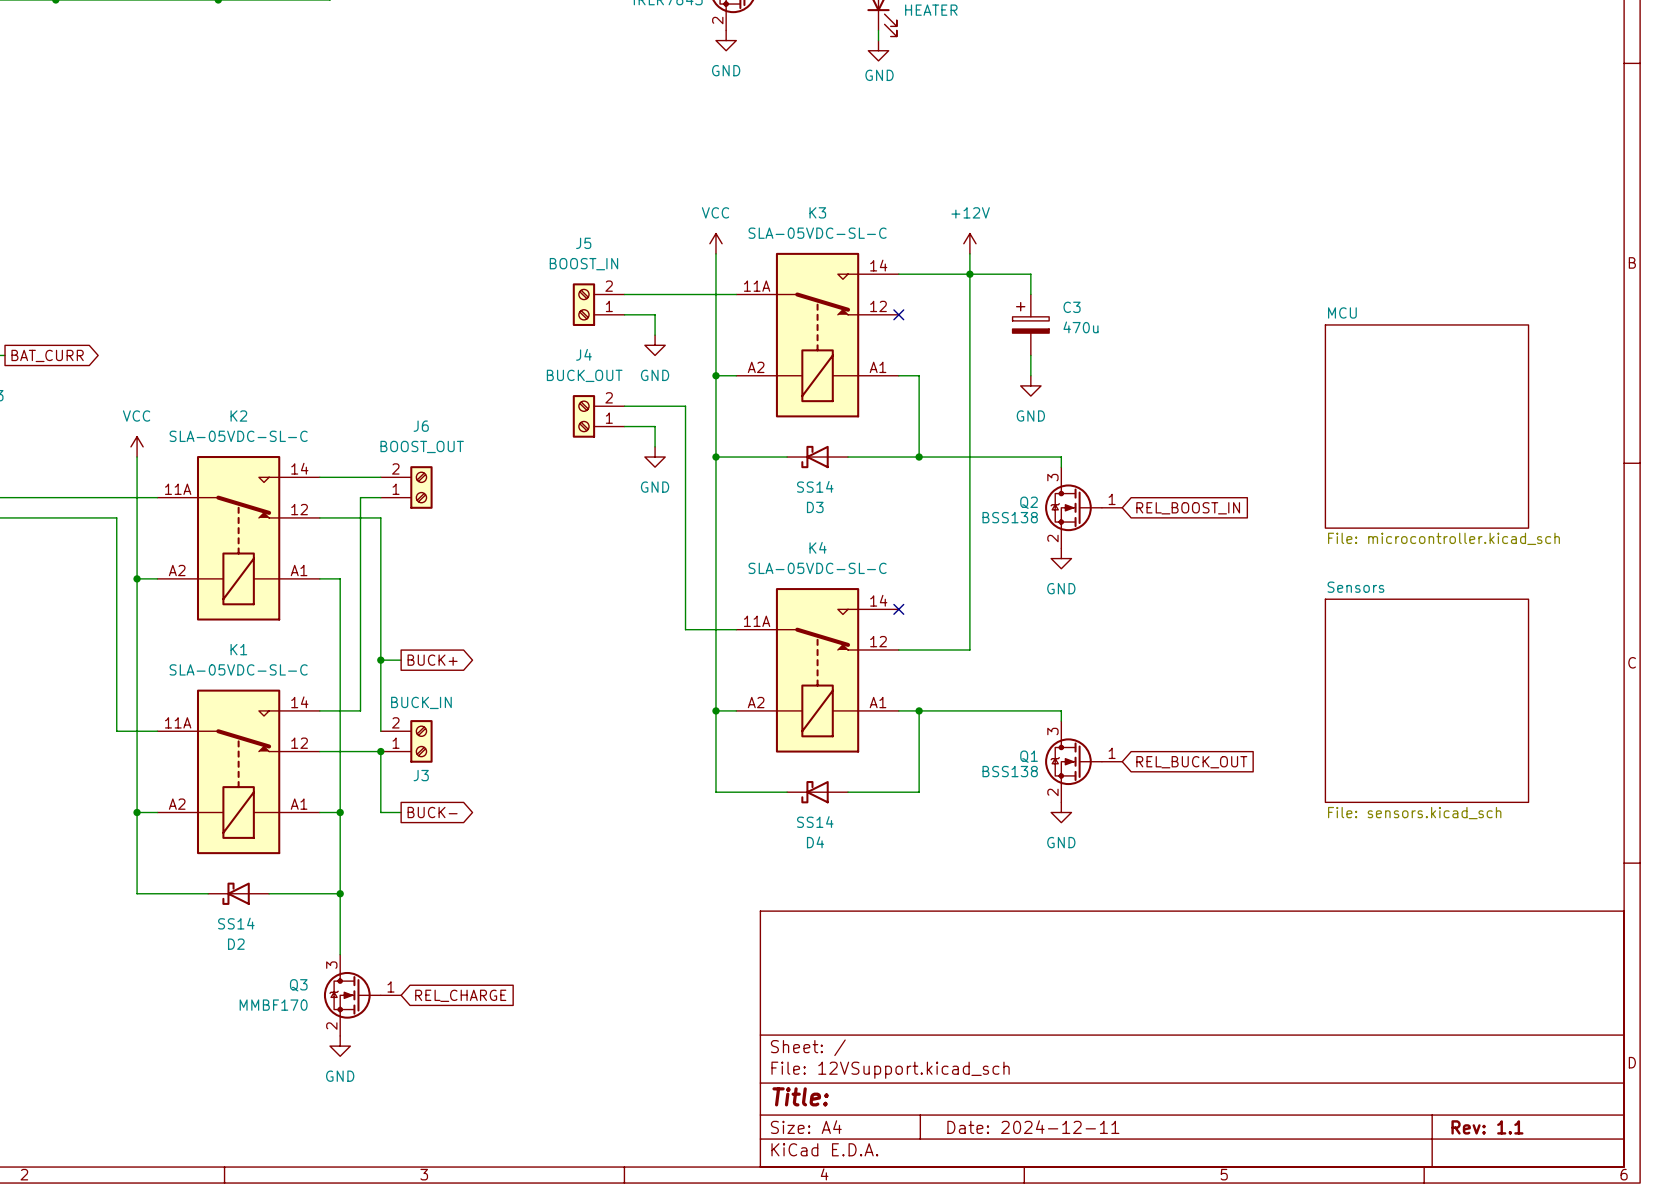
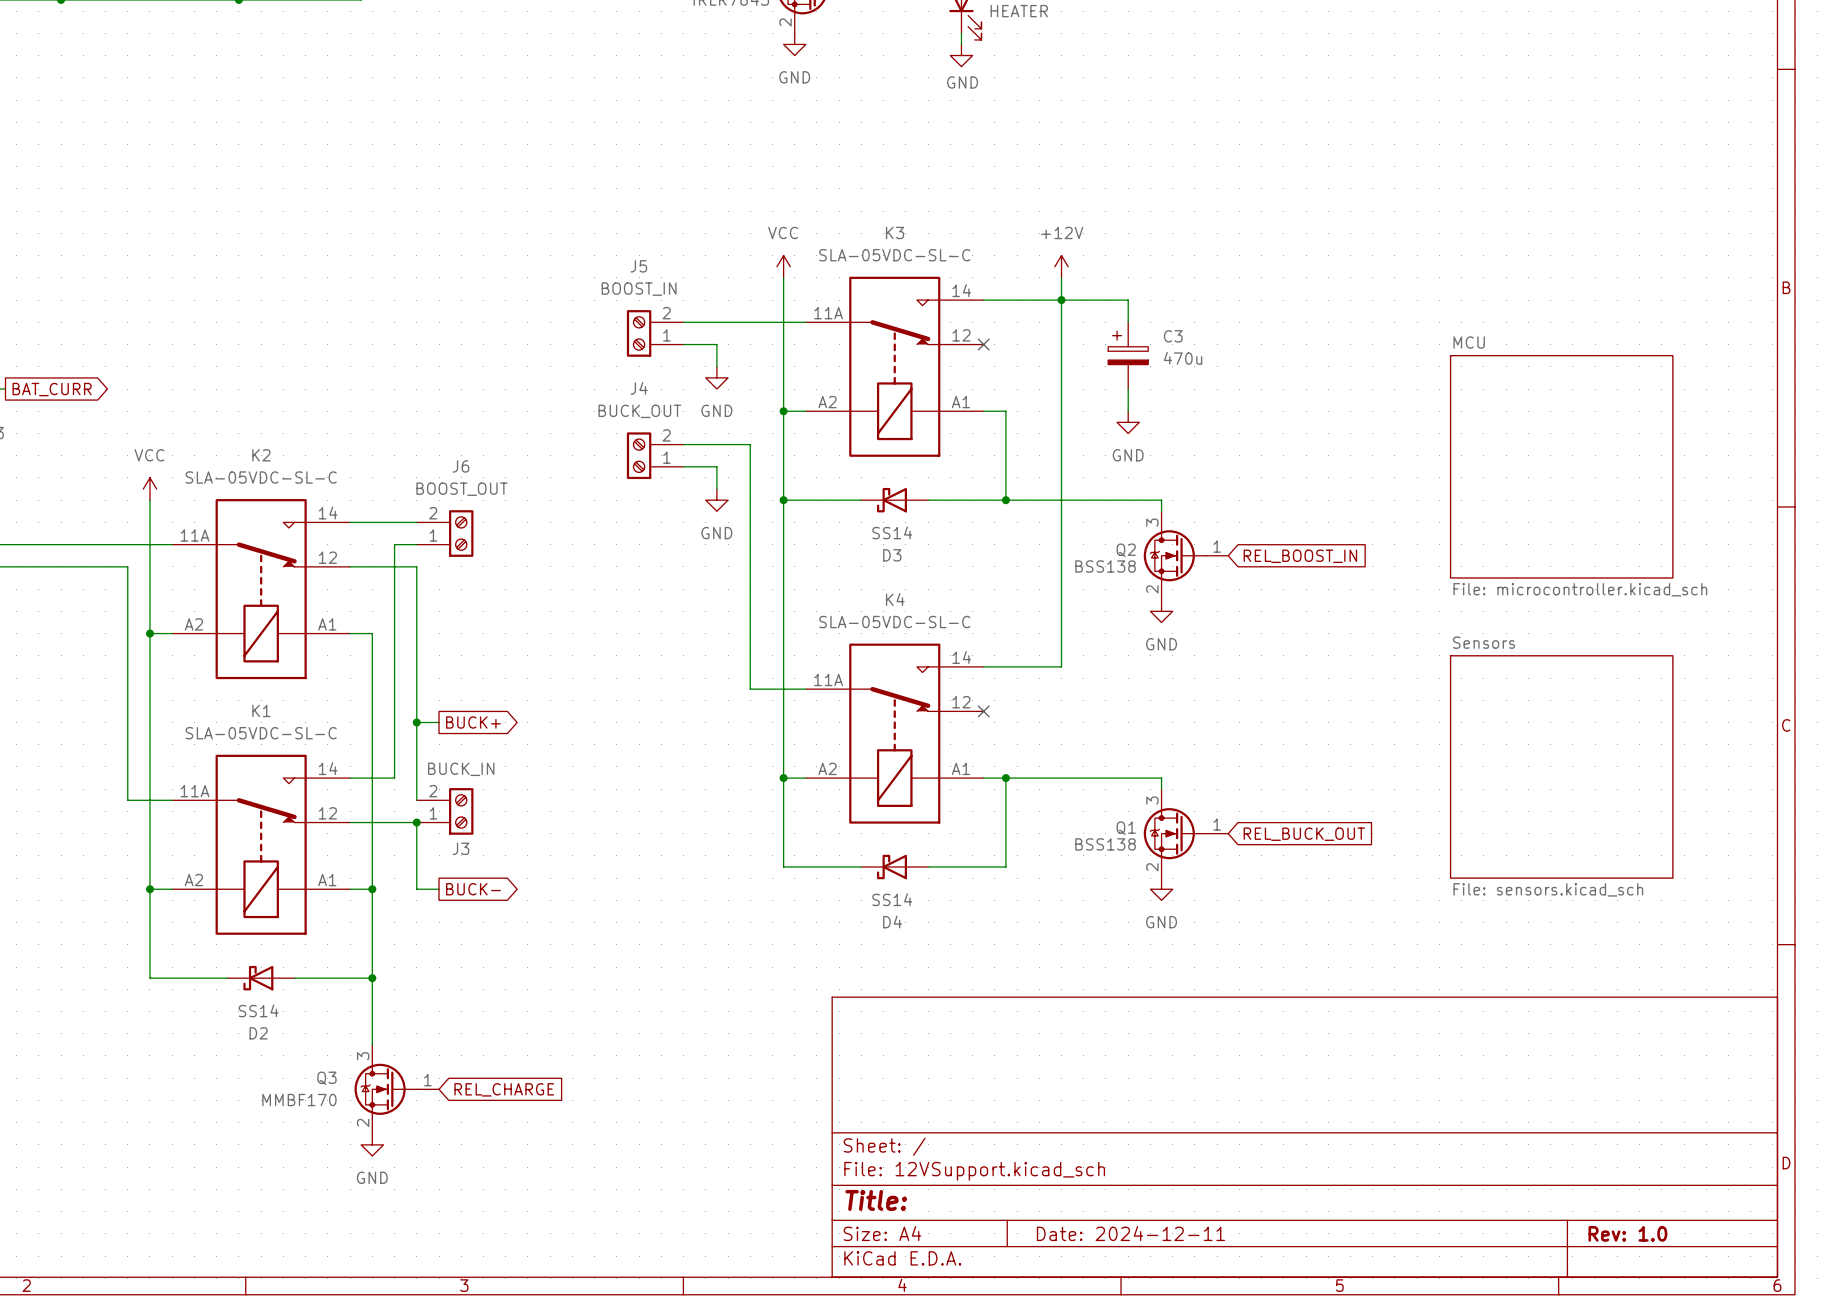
no-connect mark position: (898, 609) -> (983, 711)
wire: (969, 609) (969, 649) (898, 649) -> (1061, 666) (983, 666)
title block: Rev: 1.1 (1487, 1127) -> Rev: 1.0 (1627, 1233)

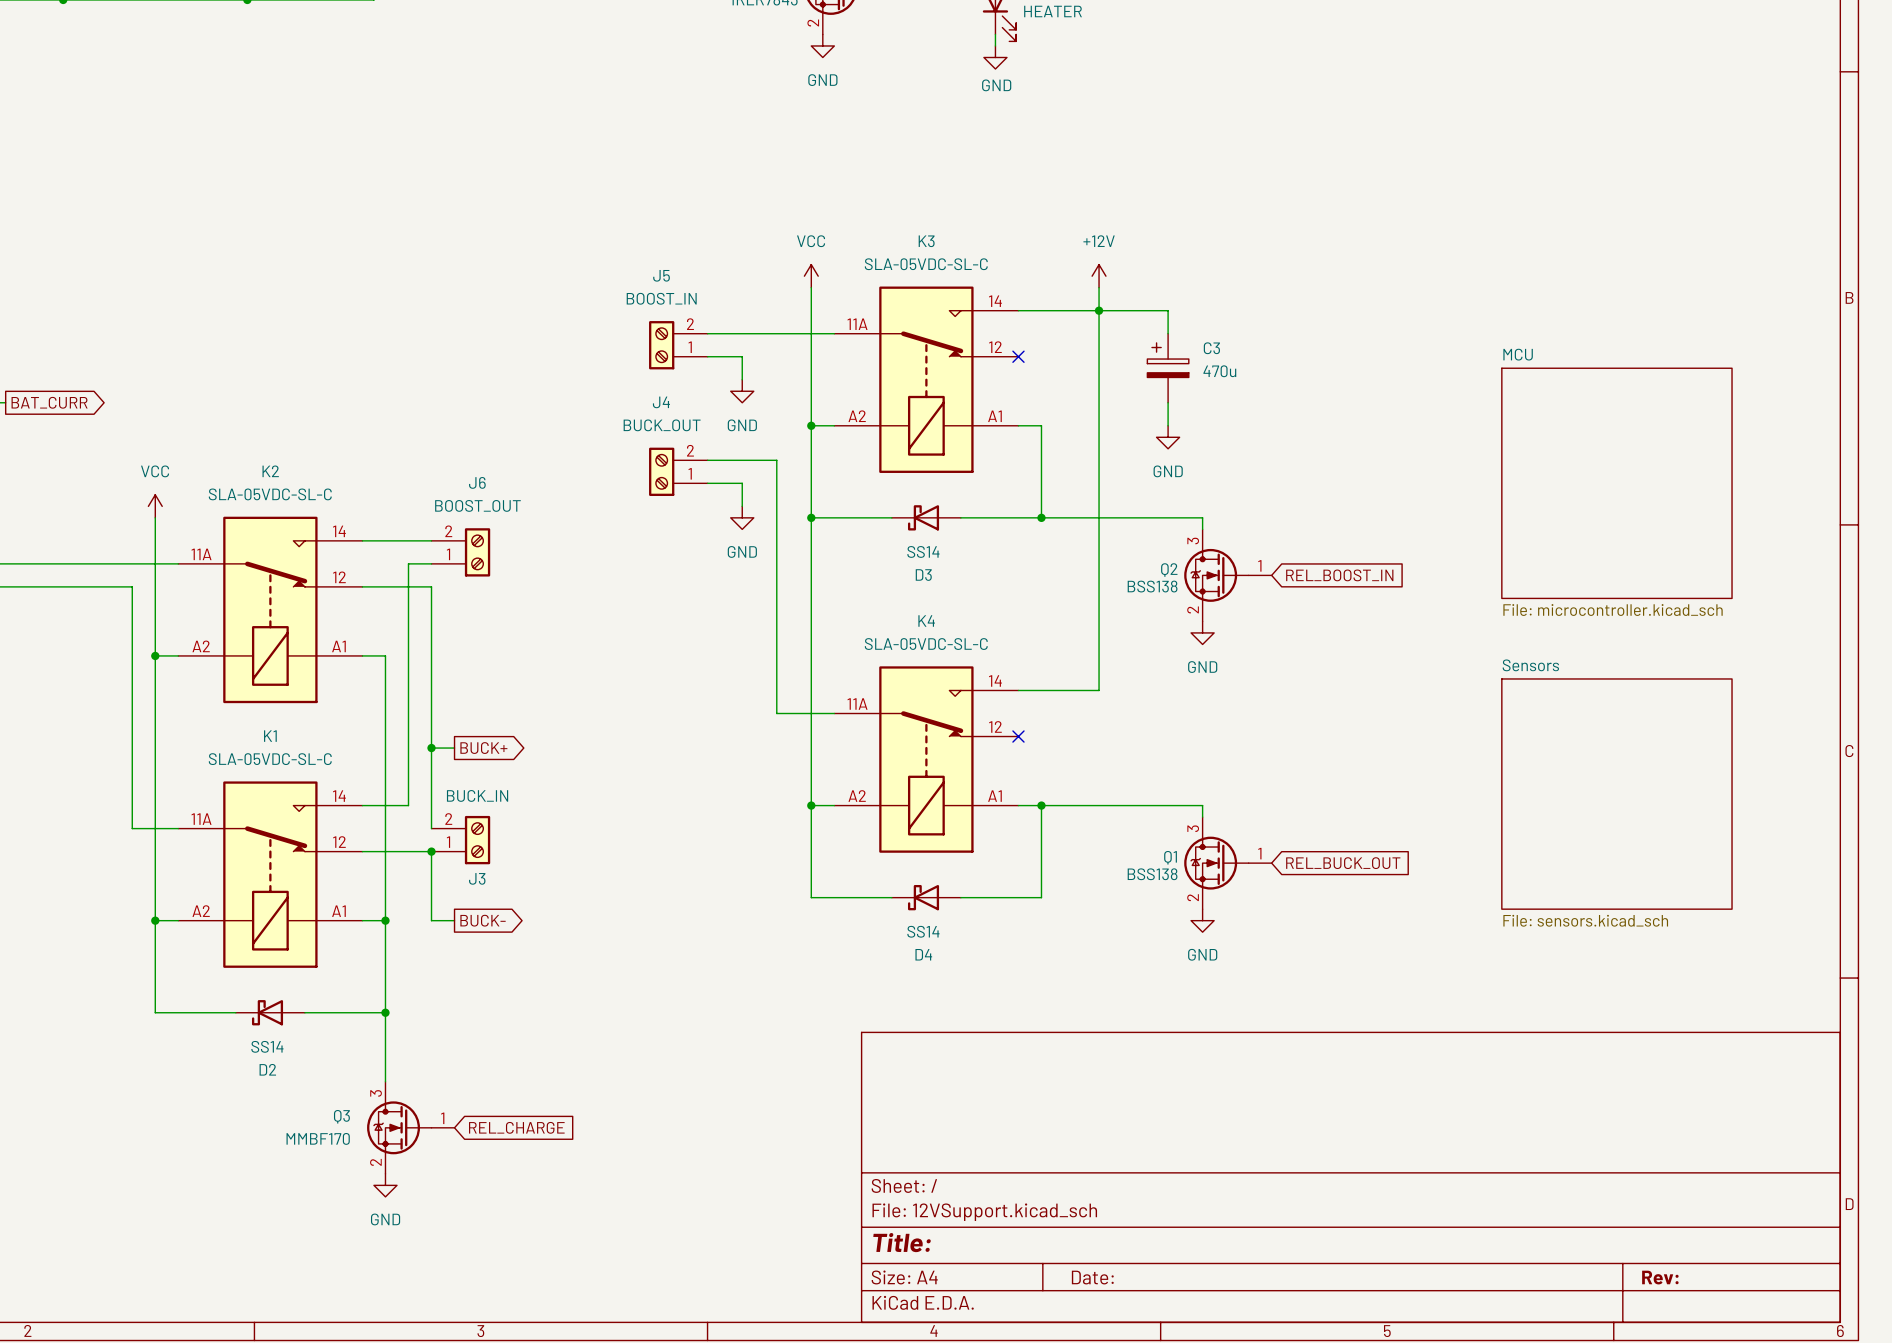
title block: Date: 2024-12-11 (1130, 1233) -> Date: (1092, 1277)
title block: Rev: 1.0 (1627, 1233) -> Rev: (1660, 1277)

